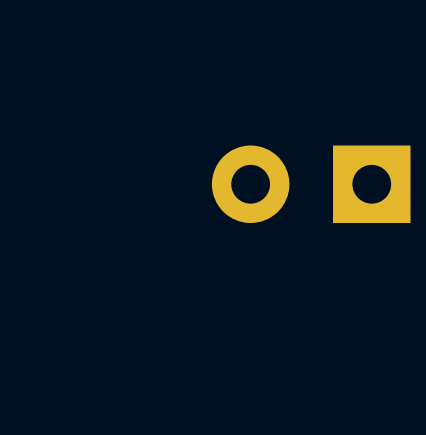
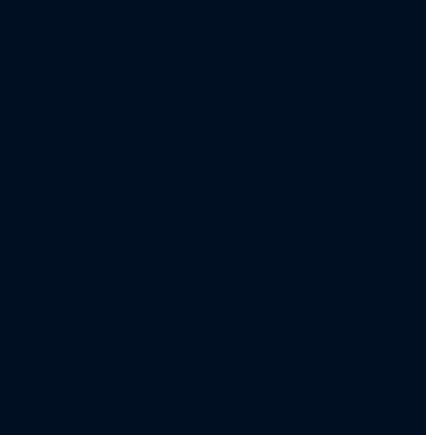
part: (311, 184) -> none

